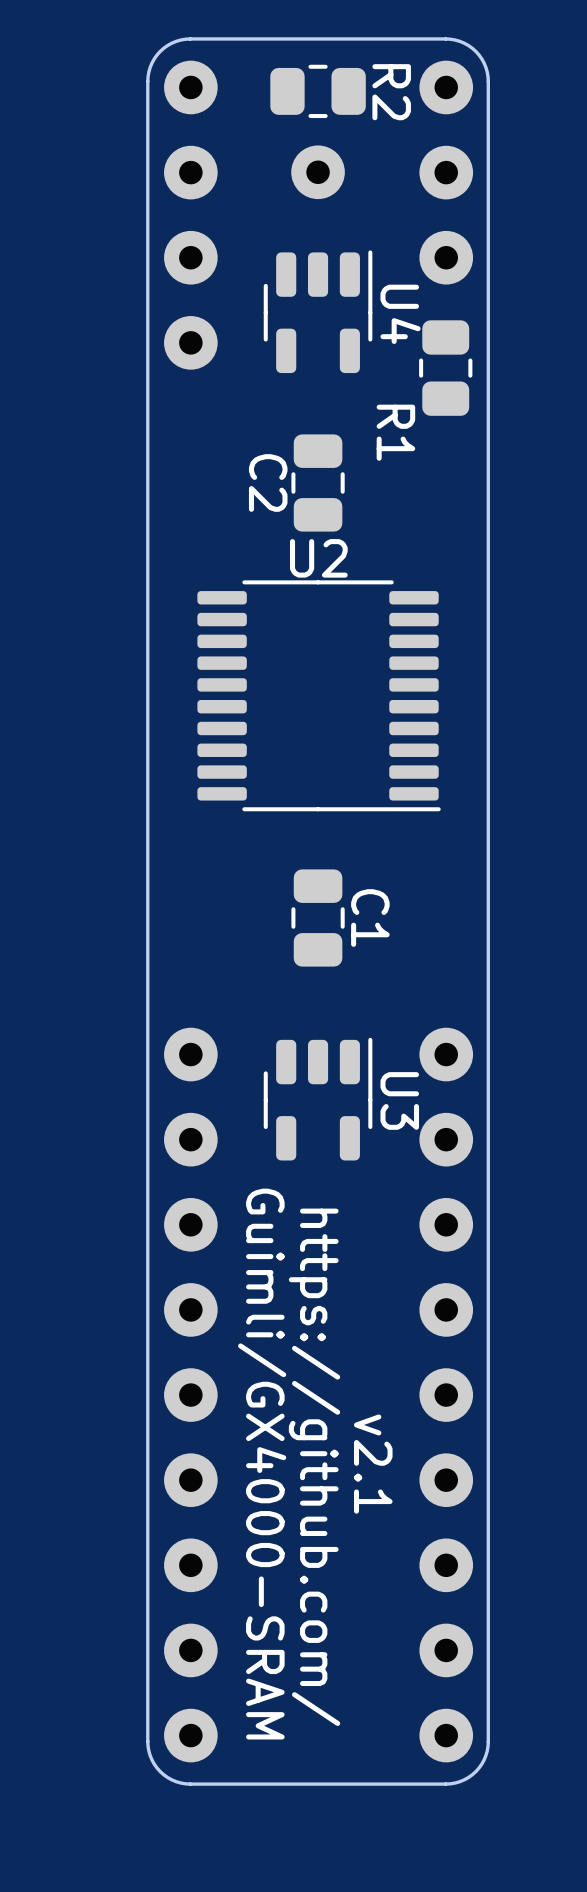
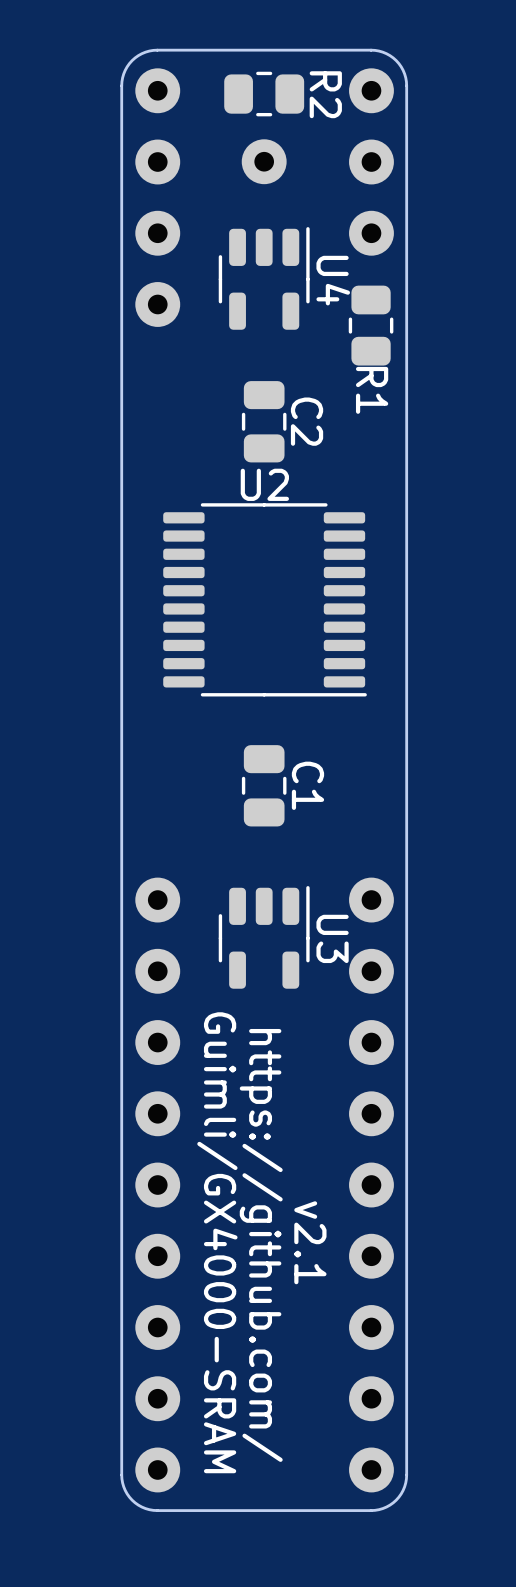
R1 name position: R1 (395, 432) -> R1 (372, 390)
C2 name position: C2 (268, 482) -> C2 (307, 421)

